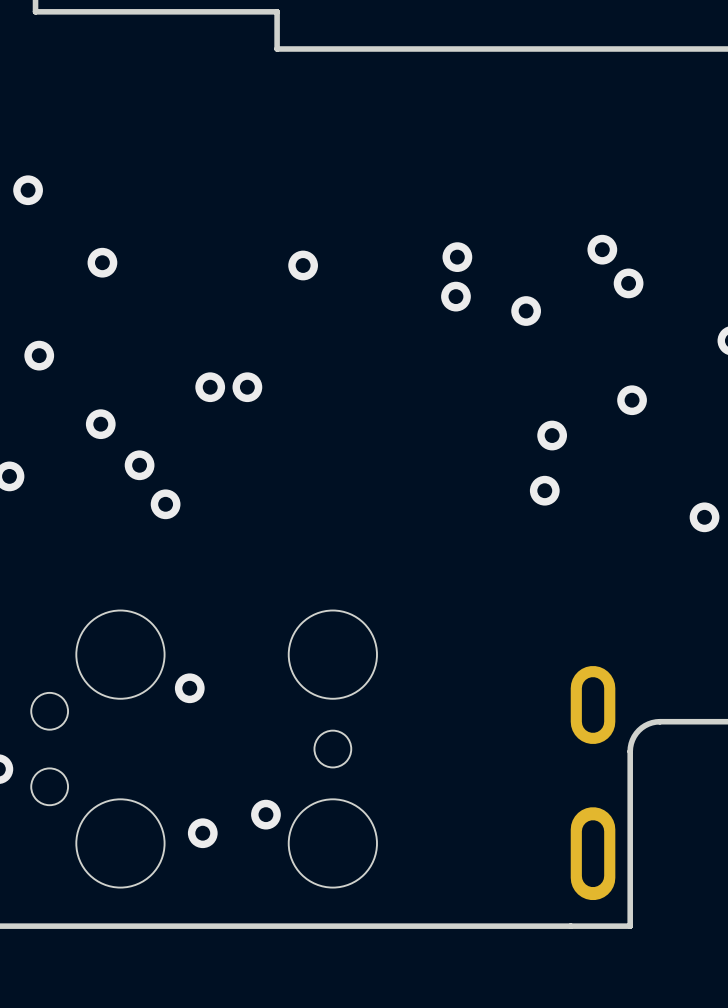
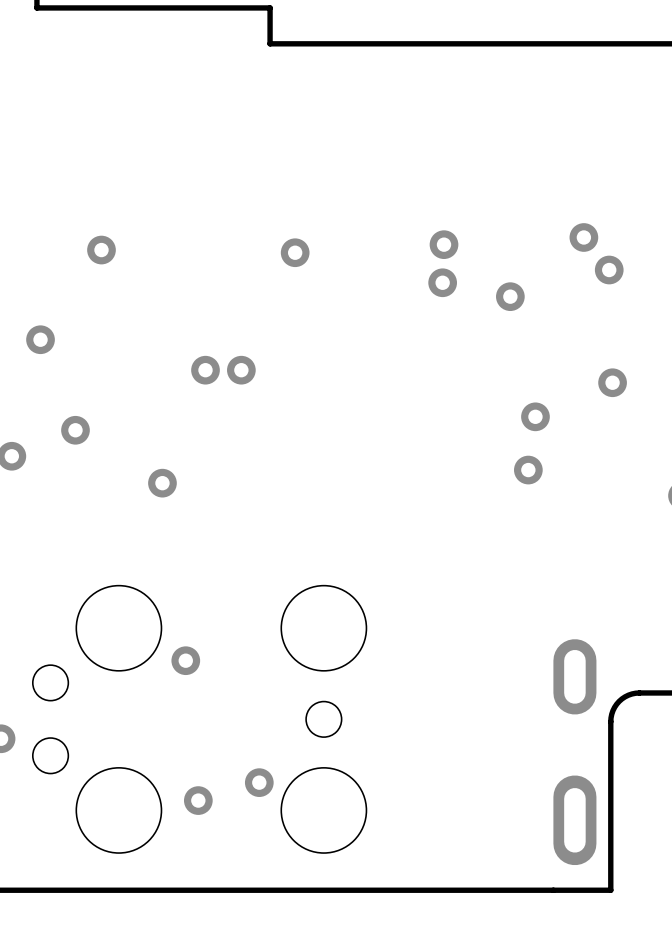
via: (28, 190) -> none
via position: (100, 424) -> (75, 430)
via: (139, 465) -> none

